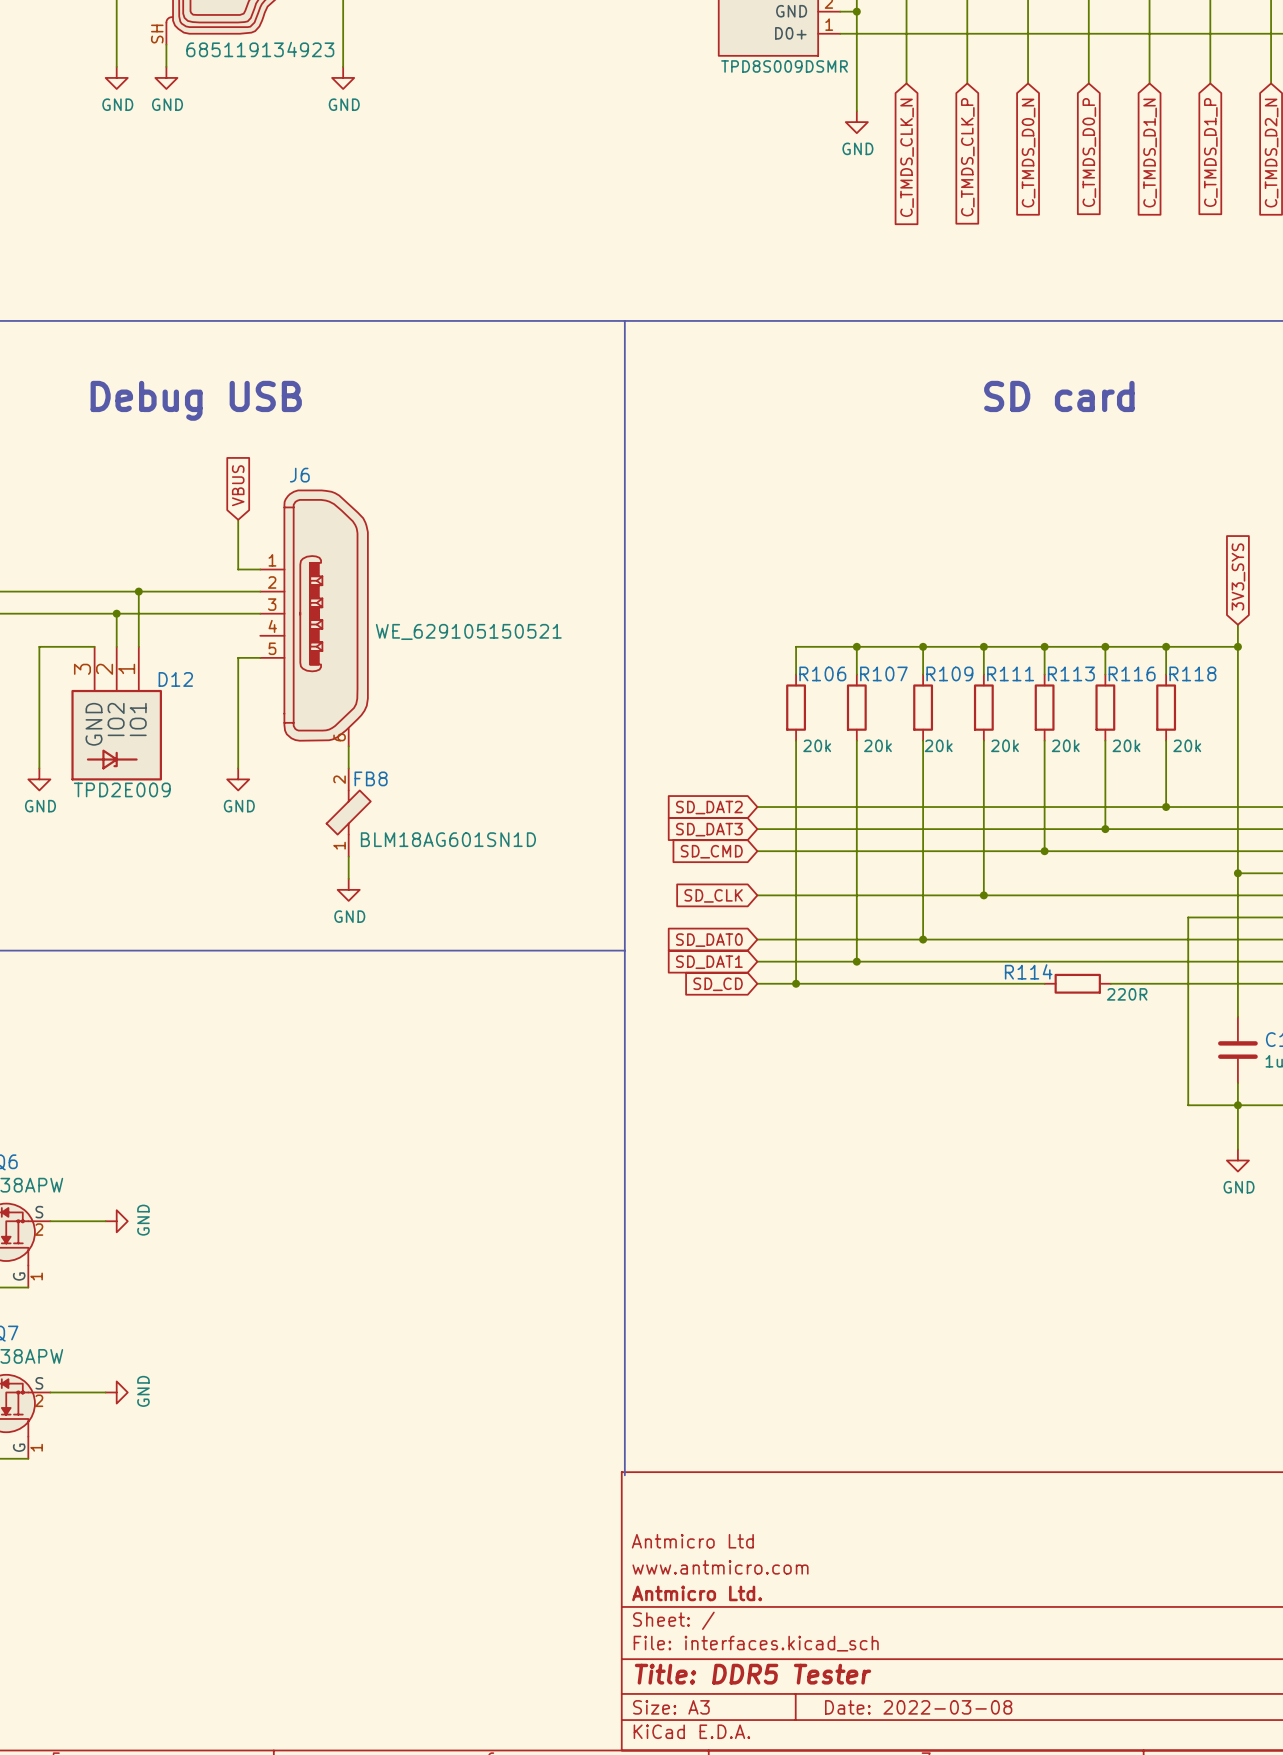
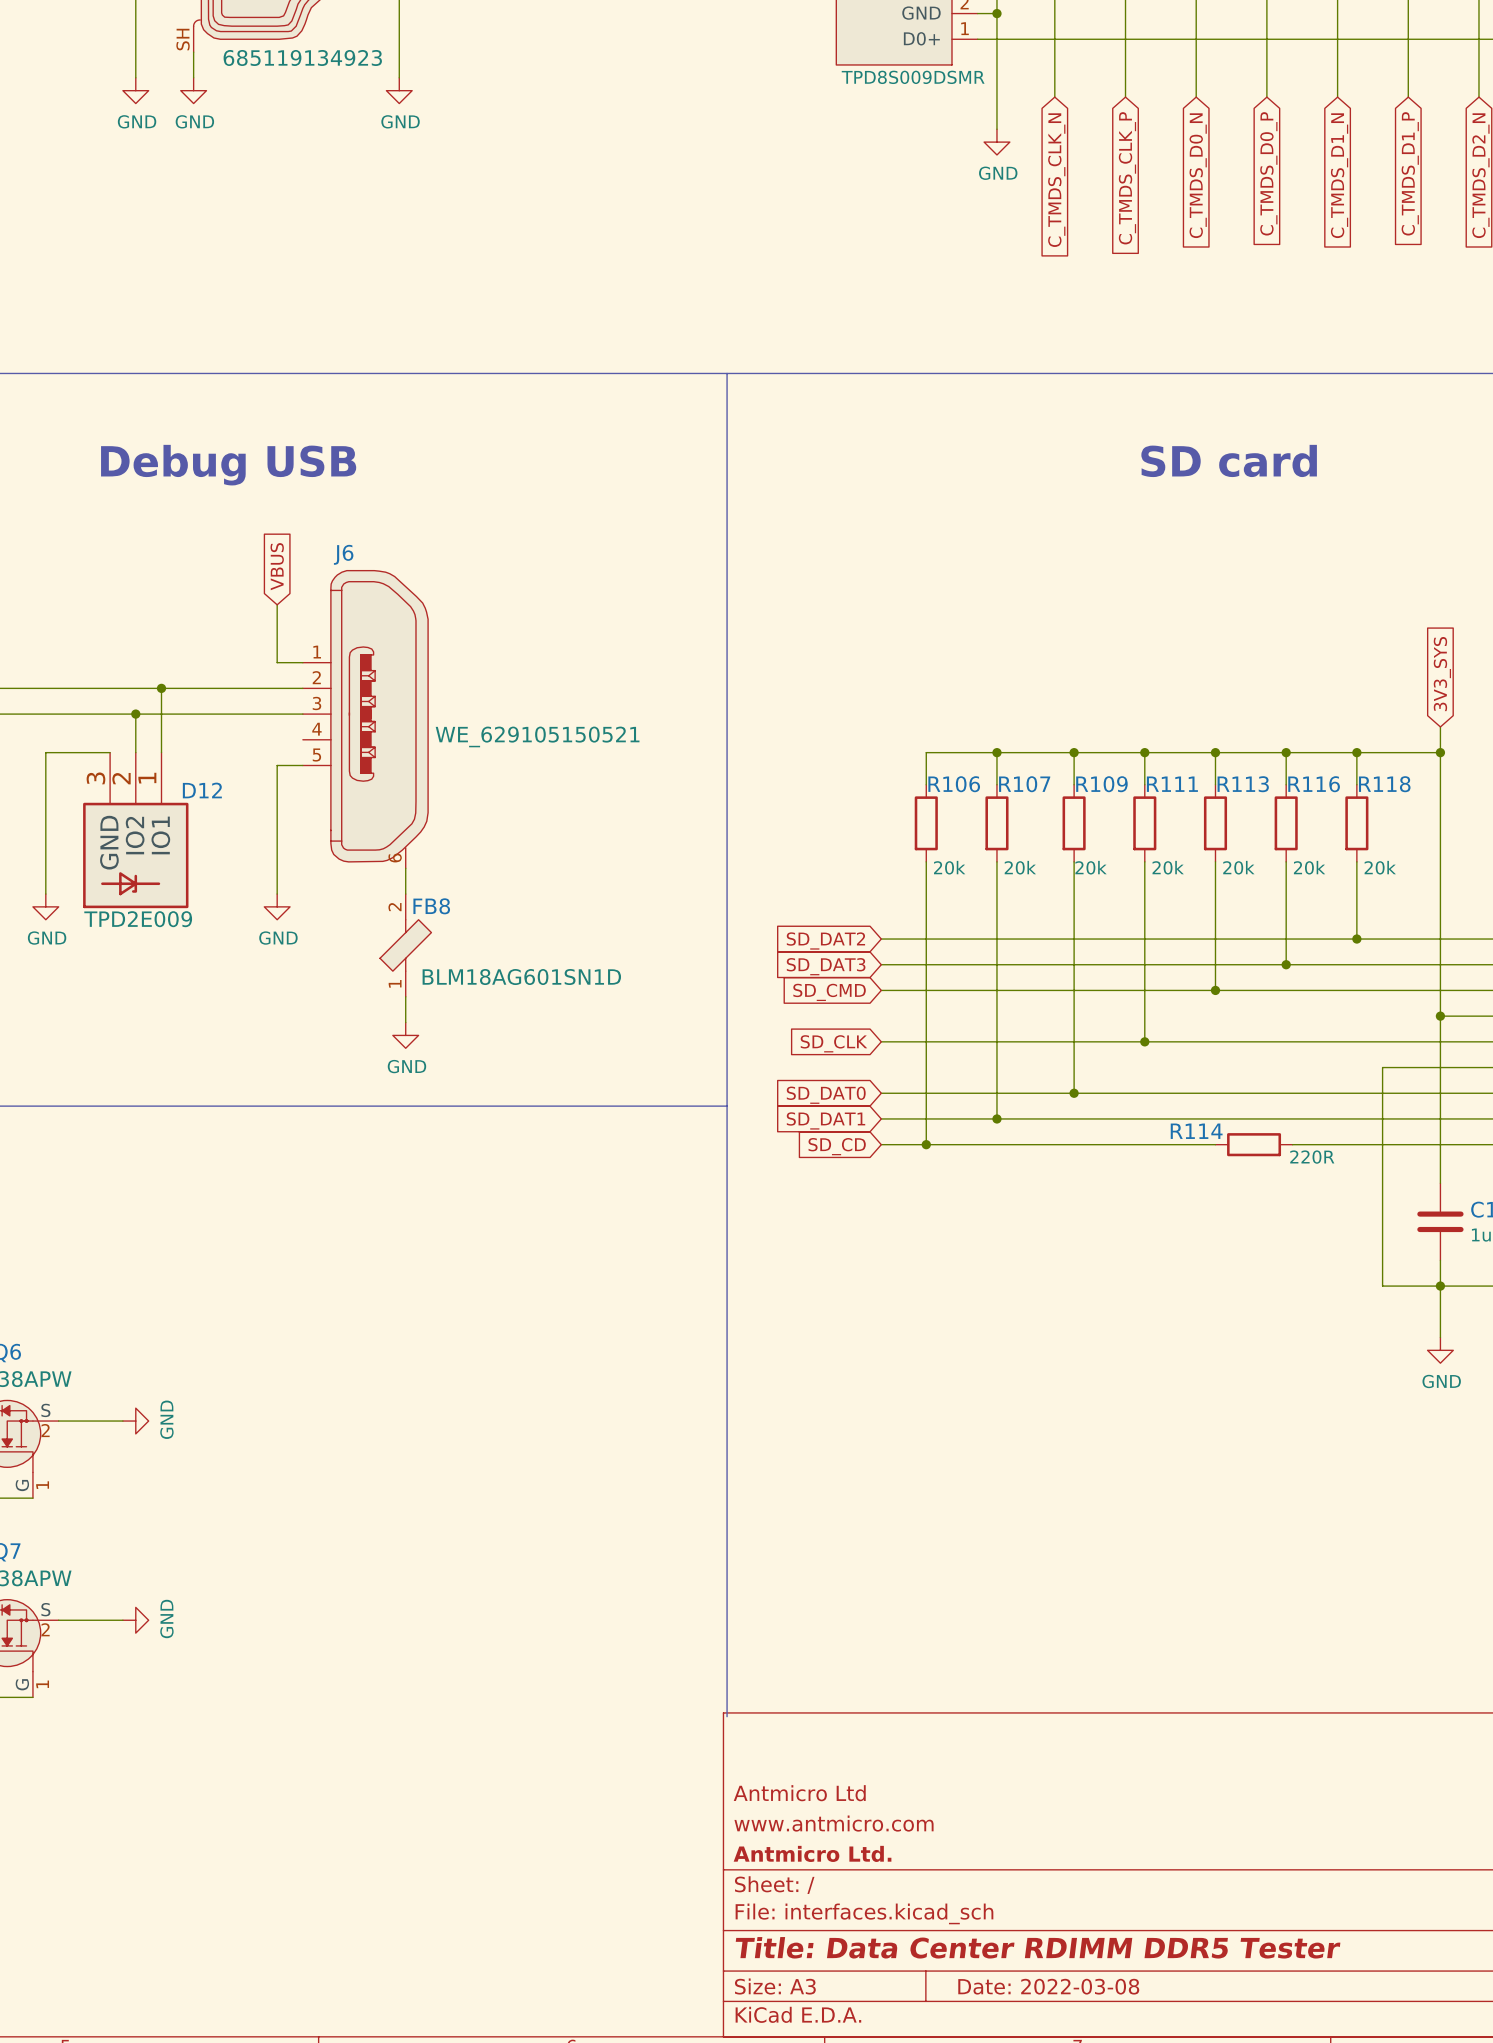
title block: Title: DDR5 Tester (753, 1674) -> Title: Data Center RDIMM DDR5 Tester (1038, 1947)

